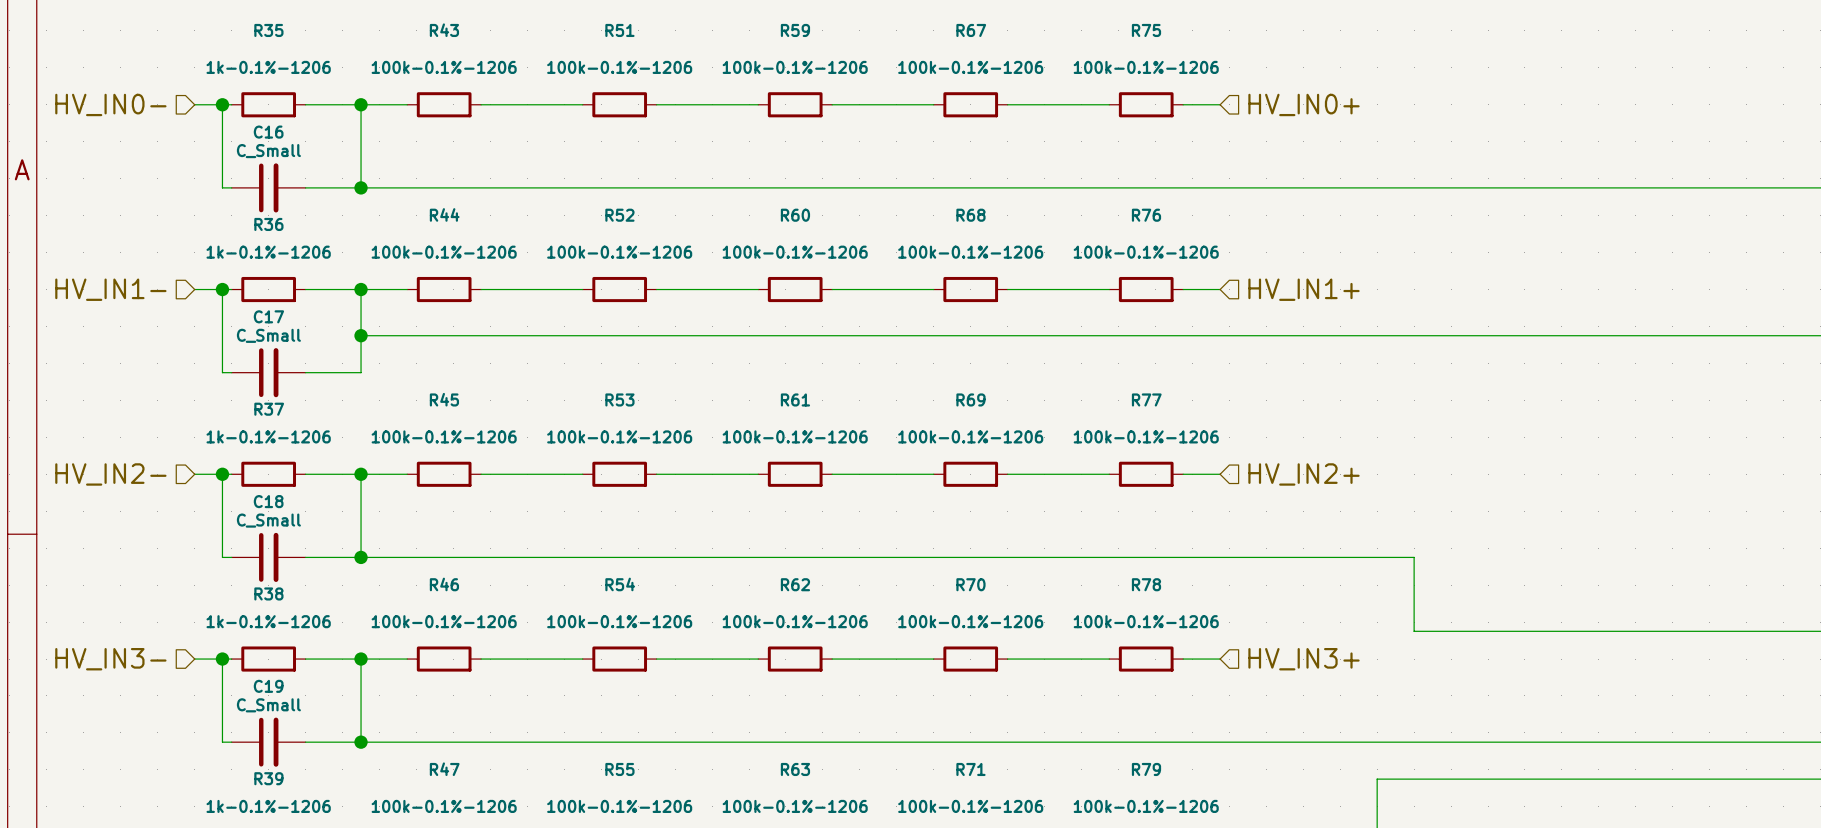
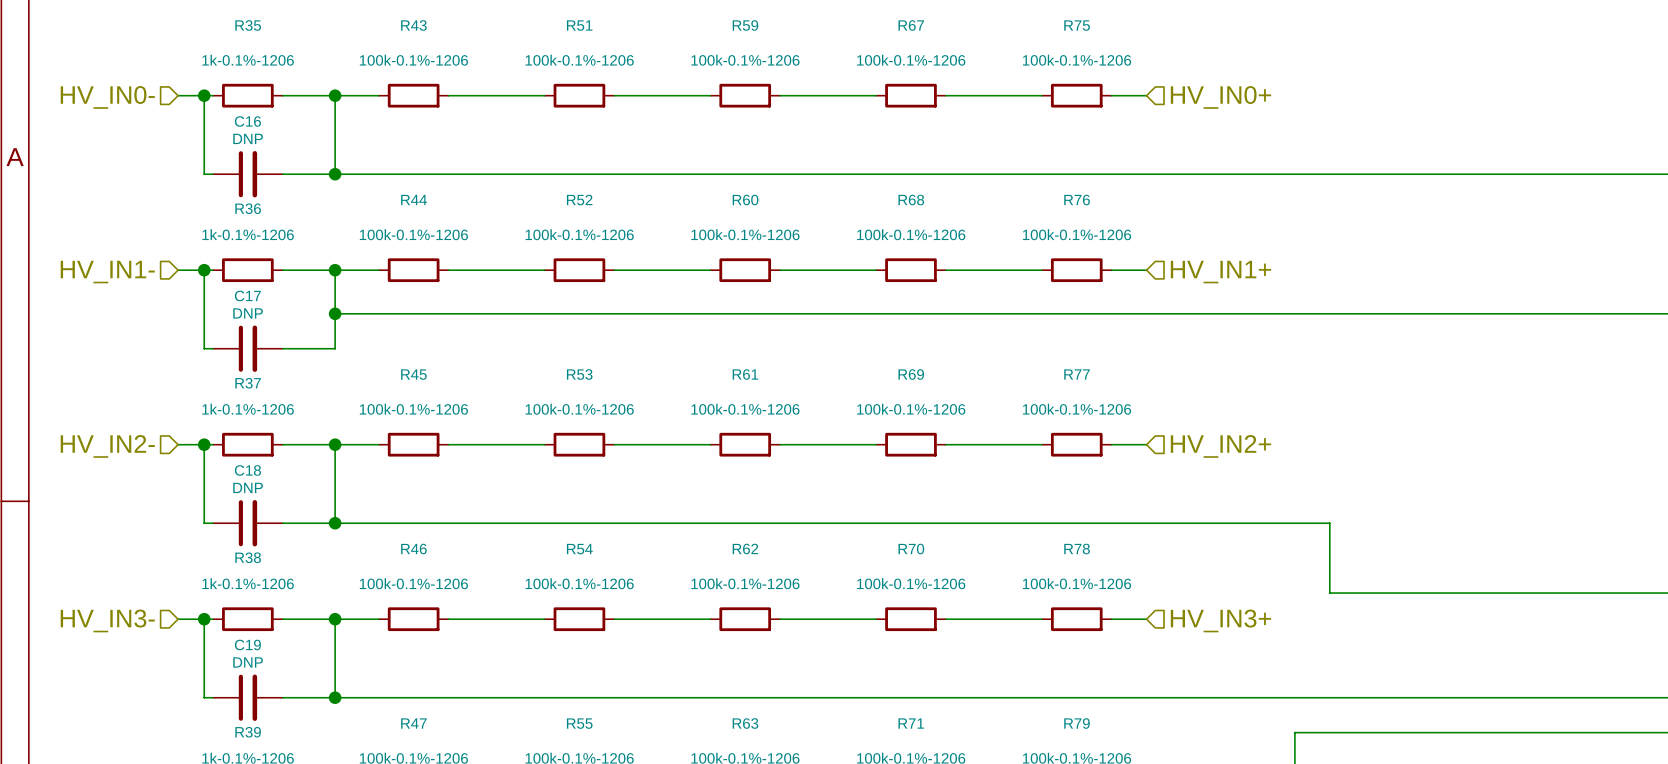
C16 value: C_Small (268, 151) -> DNP (248, 138)
C17 value: C_Small (268, 335) -> DNP (248, 313)
C18 value: C_Small (268, 520) -> DNP (248, 487)
C19 value: C_Small (268, 705) -> DNP (248, 662)

